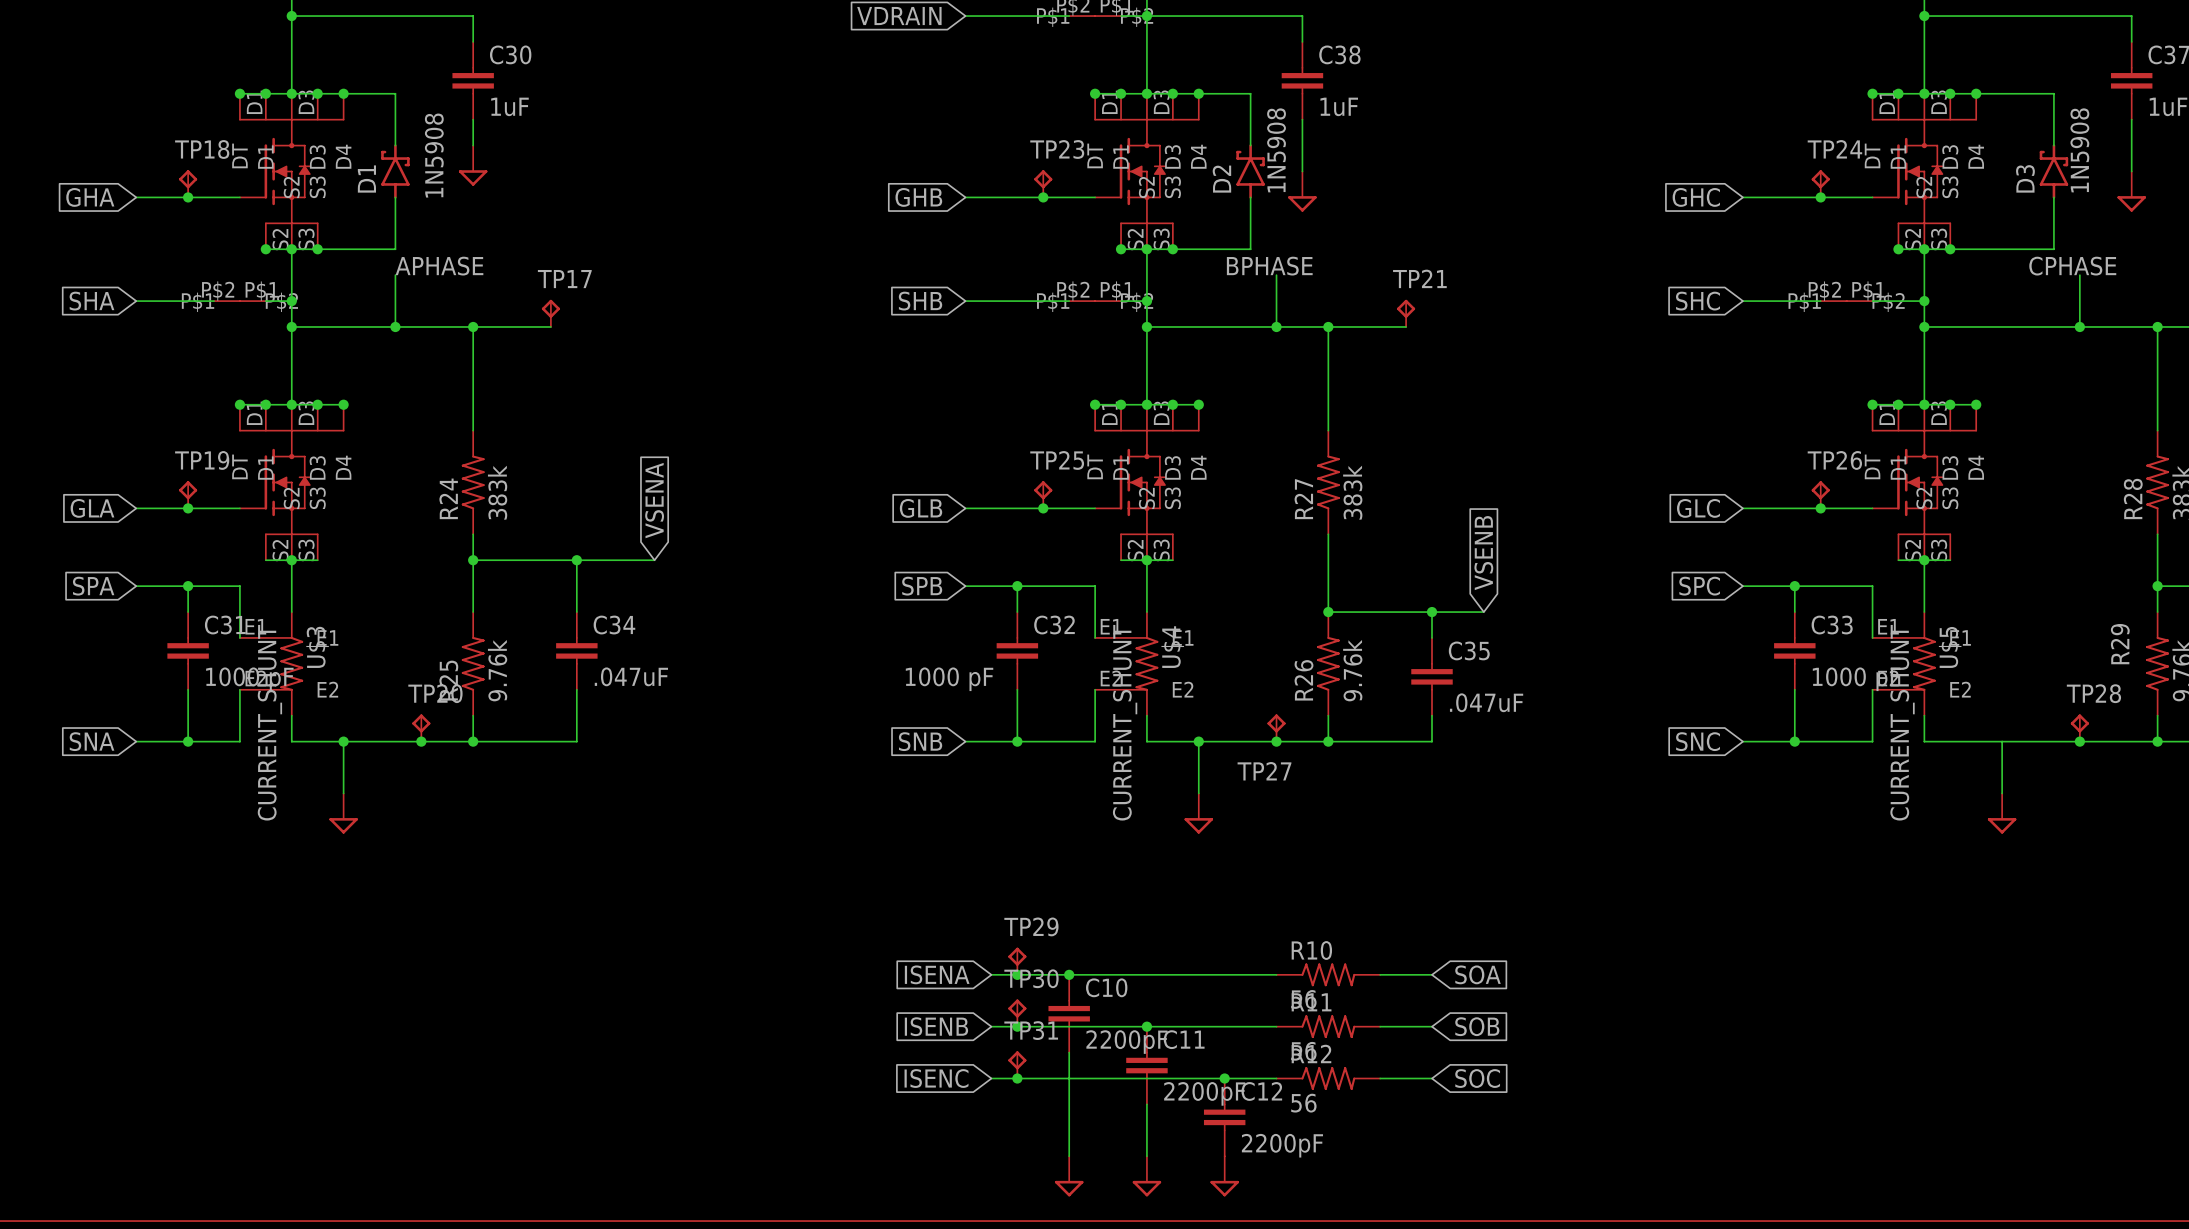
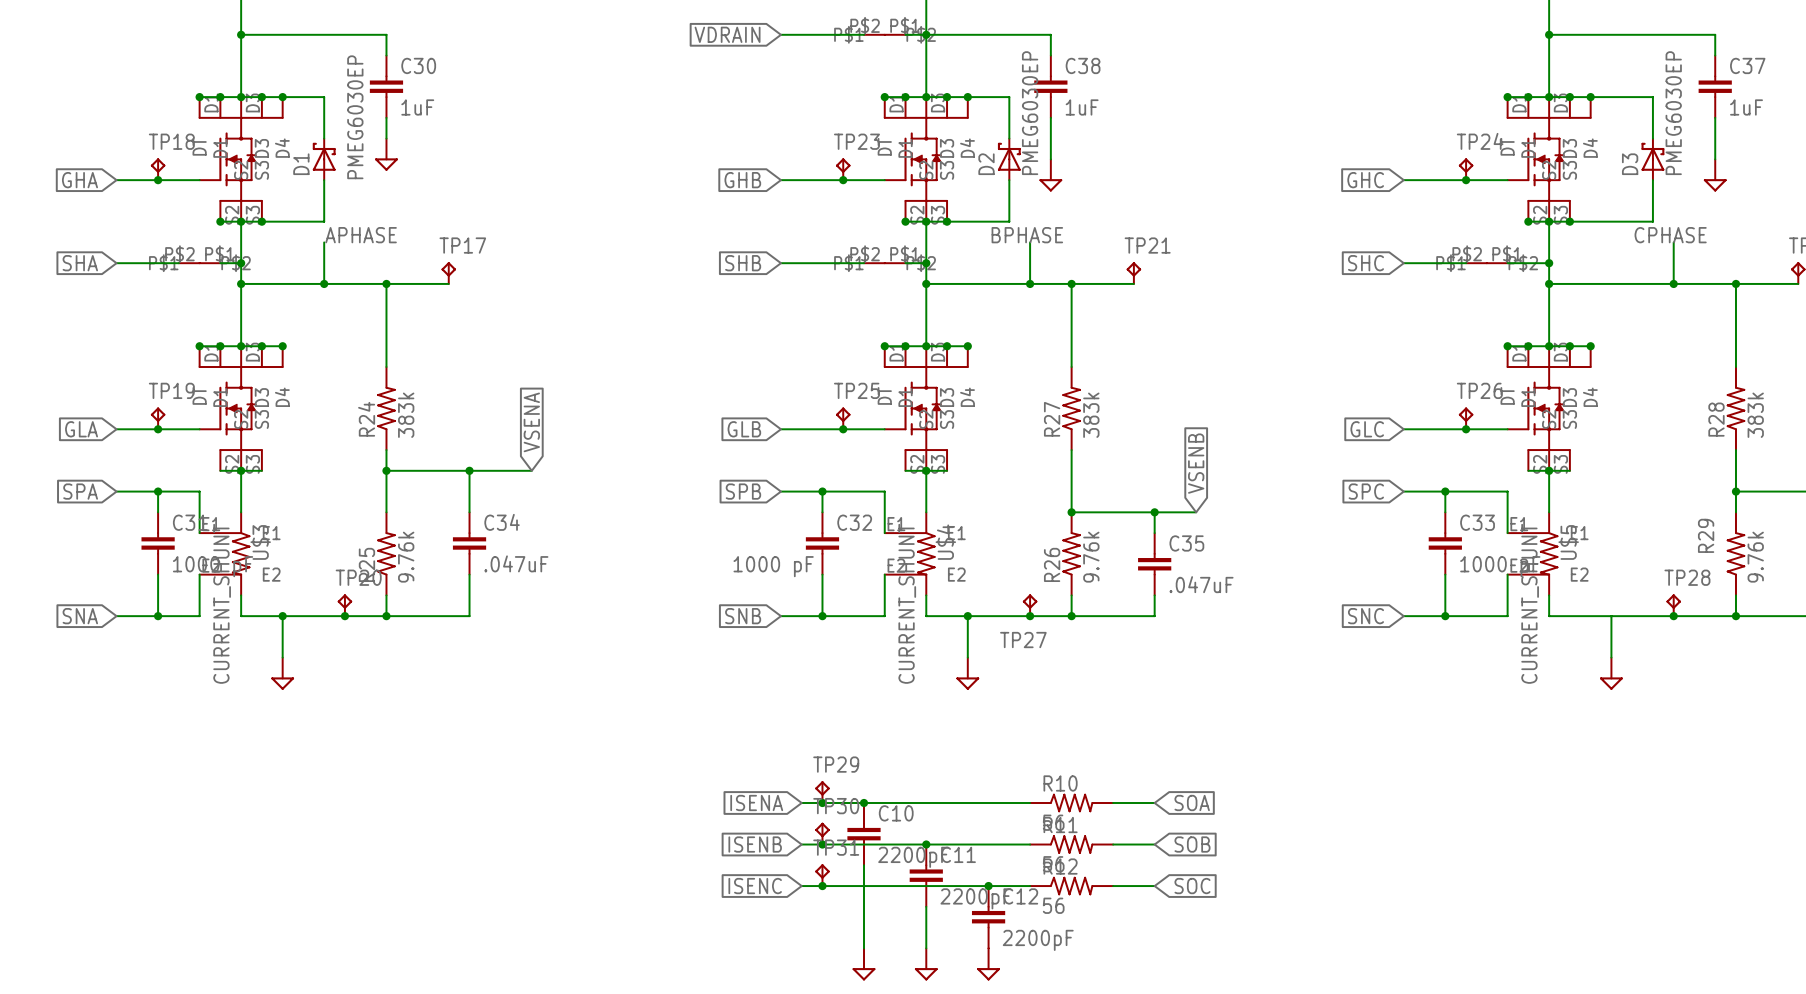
D1 symbol: [381, 144, 410, 199] -> [312, 138, 336, 181]
D2 symbol: [1236, 144, 1265, 199] -> [997, 138, 1021, 181]
D3 symbol: [2039, 144, 2069, 199] -> [1641, 138, 1665, 181]
D2 value: 1N5908 (1276, 150) -> PMEG6030EP (1030, 113)
D3 value: 1N5908 (2079, 150) -> PMEG6030EP (1673, 113)
D1 value: 1N5908 (434, 155) -> PMEG6030EP (355, 117)

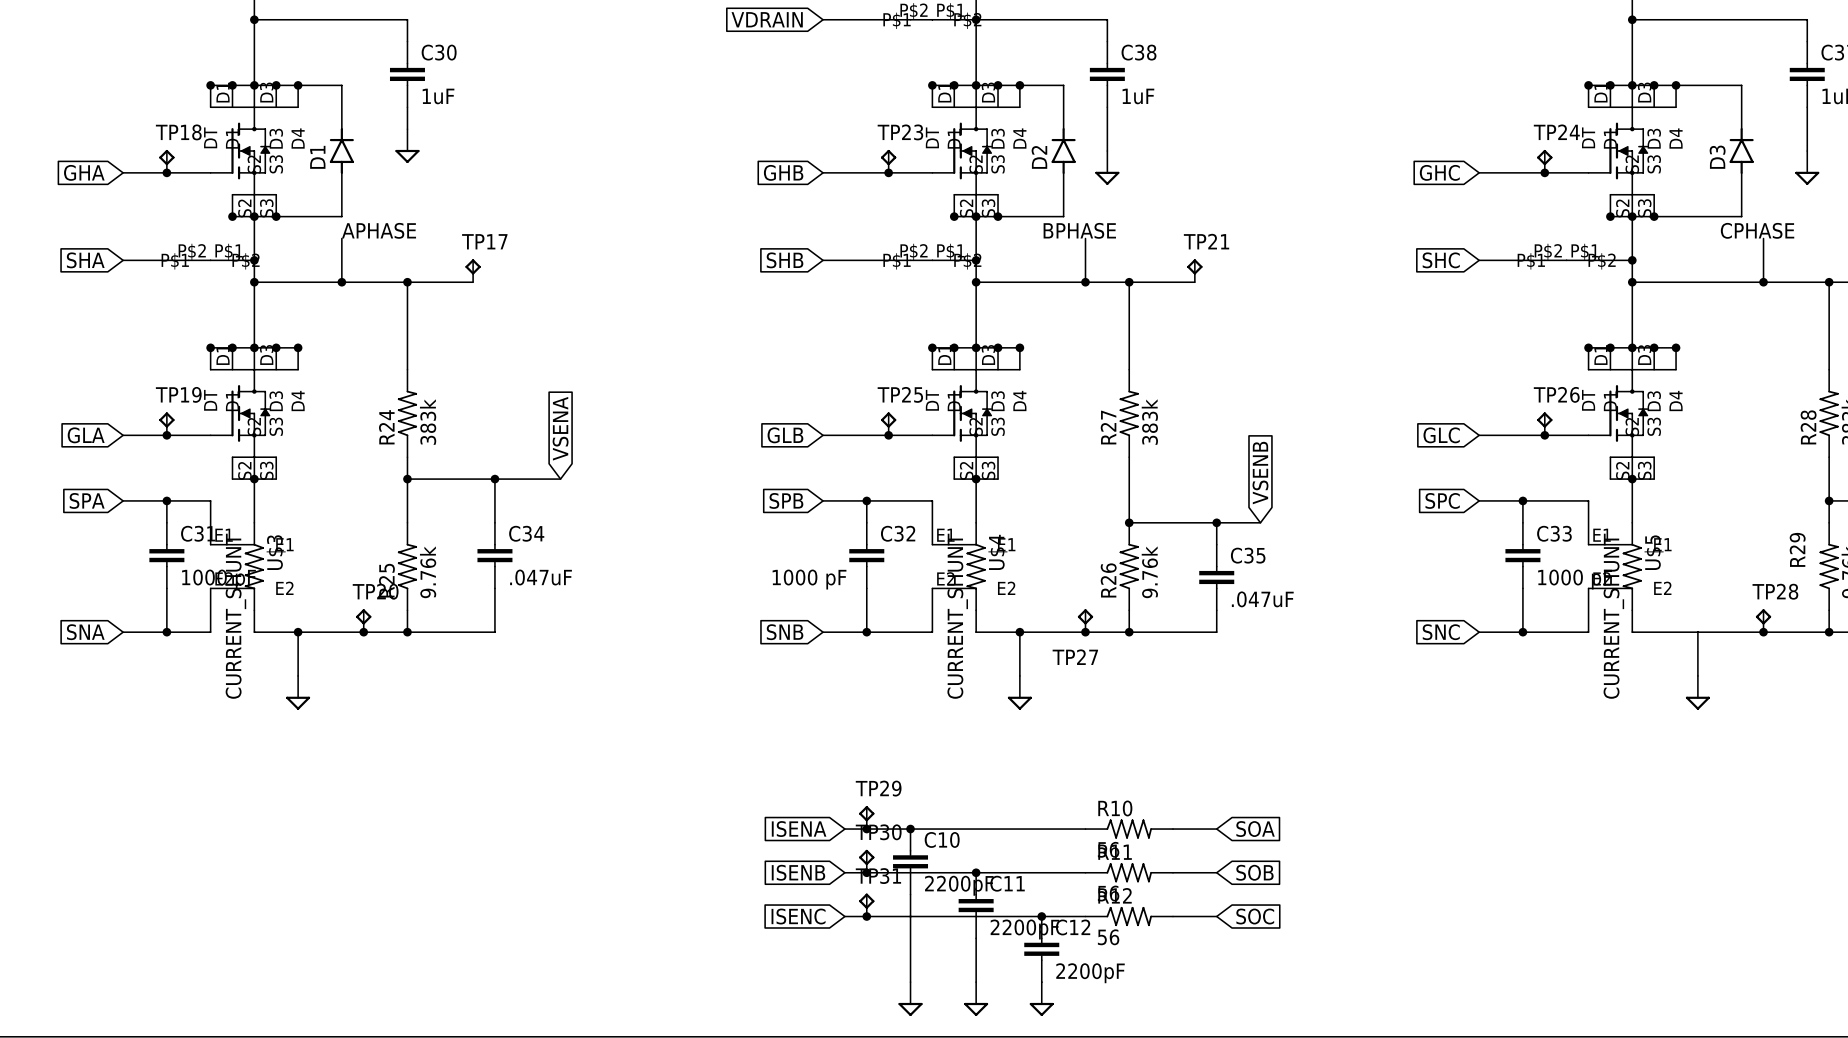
D2 value: PMEG6030EP (1030, 113) -> none
D3 value: PMEG6030EP (1673, 113) -> none
D1 value: PMEG6030EP (355, 117) -> none
D1 symbol: [312, 138, 336, 181] -> [329, 128, 354, 174]
D2 symbol: [997, 138, 1021, 181] -> [1051, 128, 1076, 174]
D3 symbol: [1641, 138, 1665, 181] -> [1729, 128, 1754, 174]

